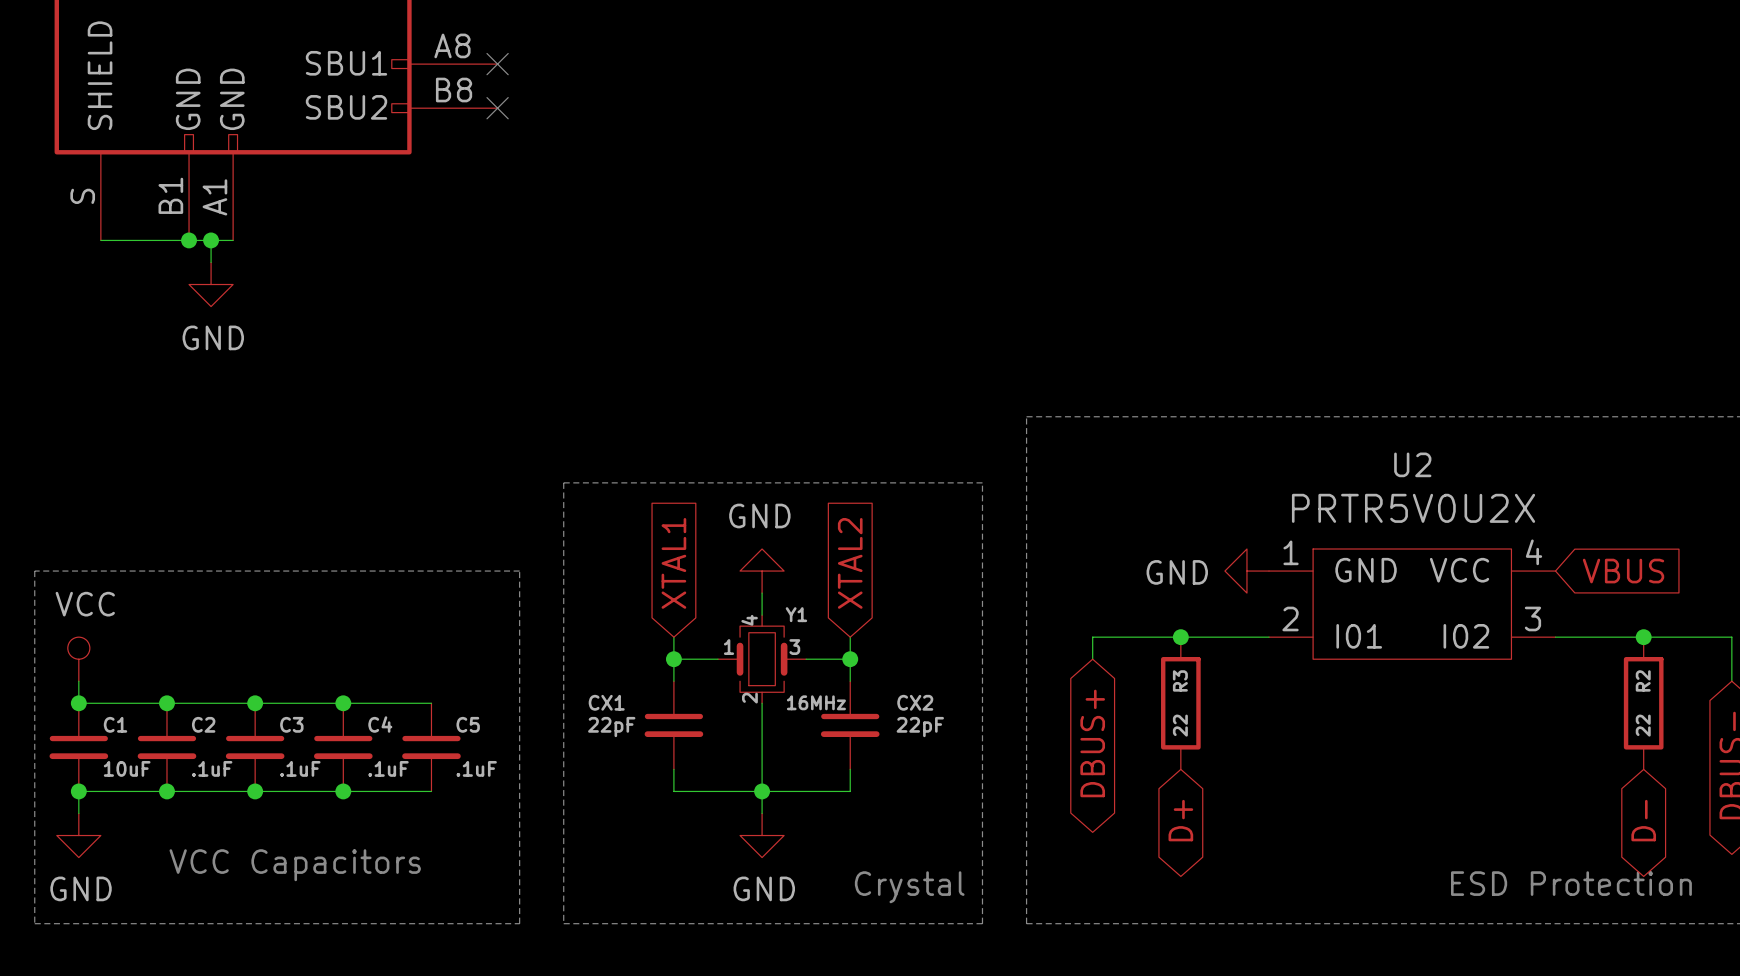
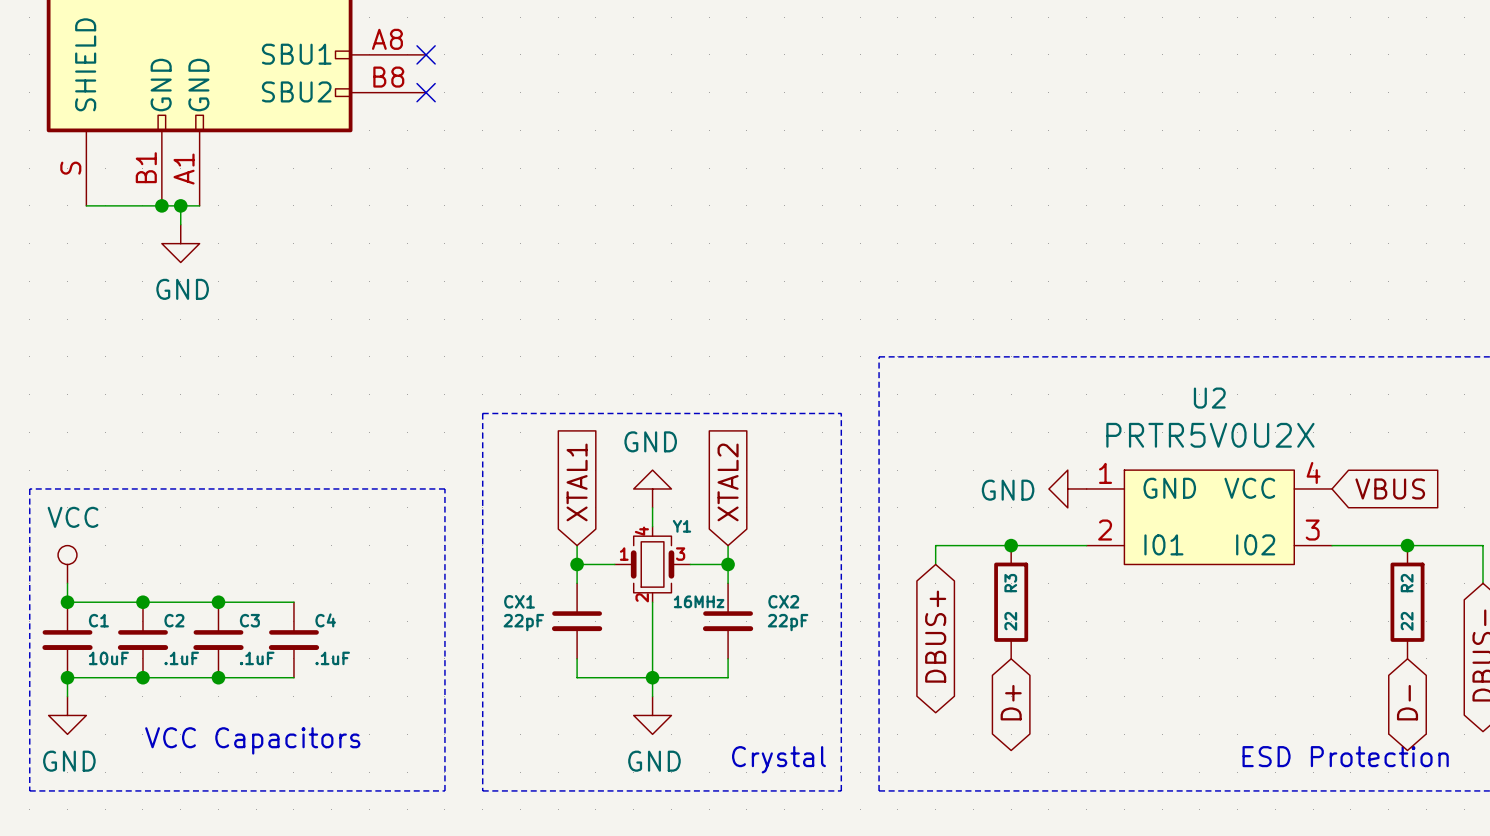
wire: (343, 703) (431, 703) -> none
junction: (343, 703) -> none
C5: .1uF (431, 747) -> none
wire: (343, 791) (431, 791) -> none
junction: (343, 791) -> none

